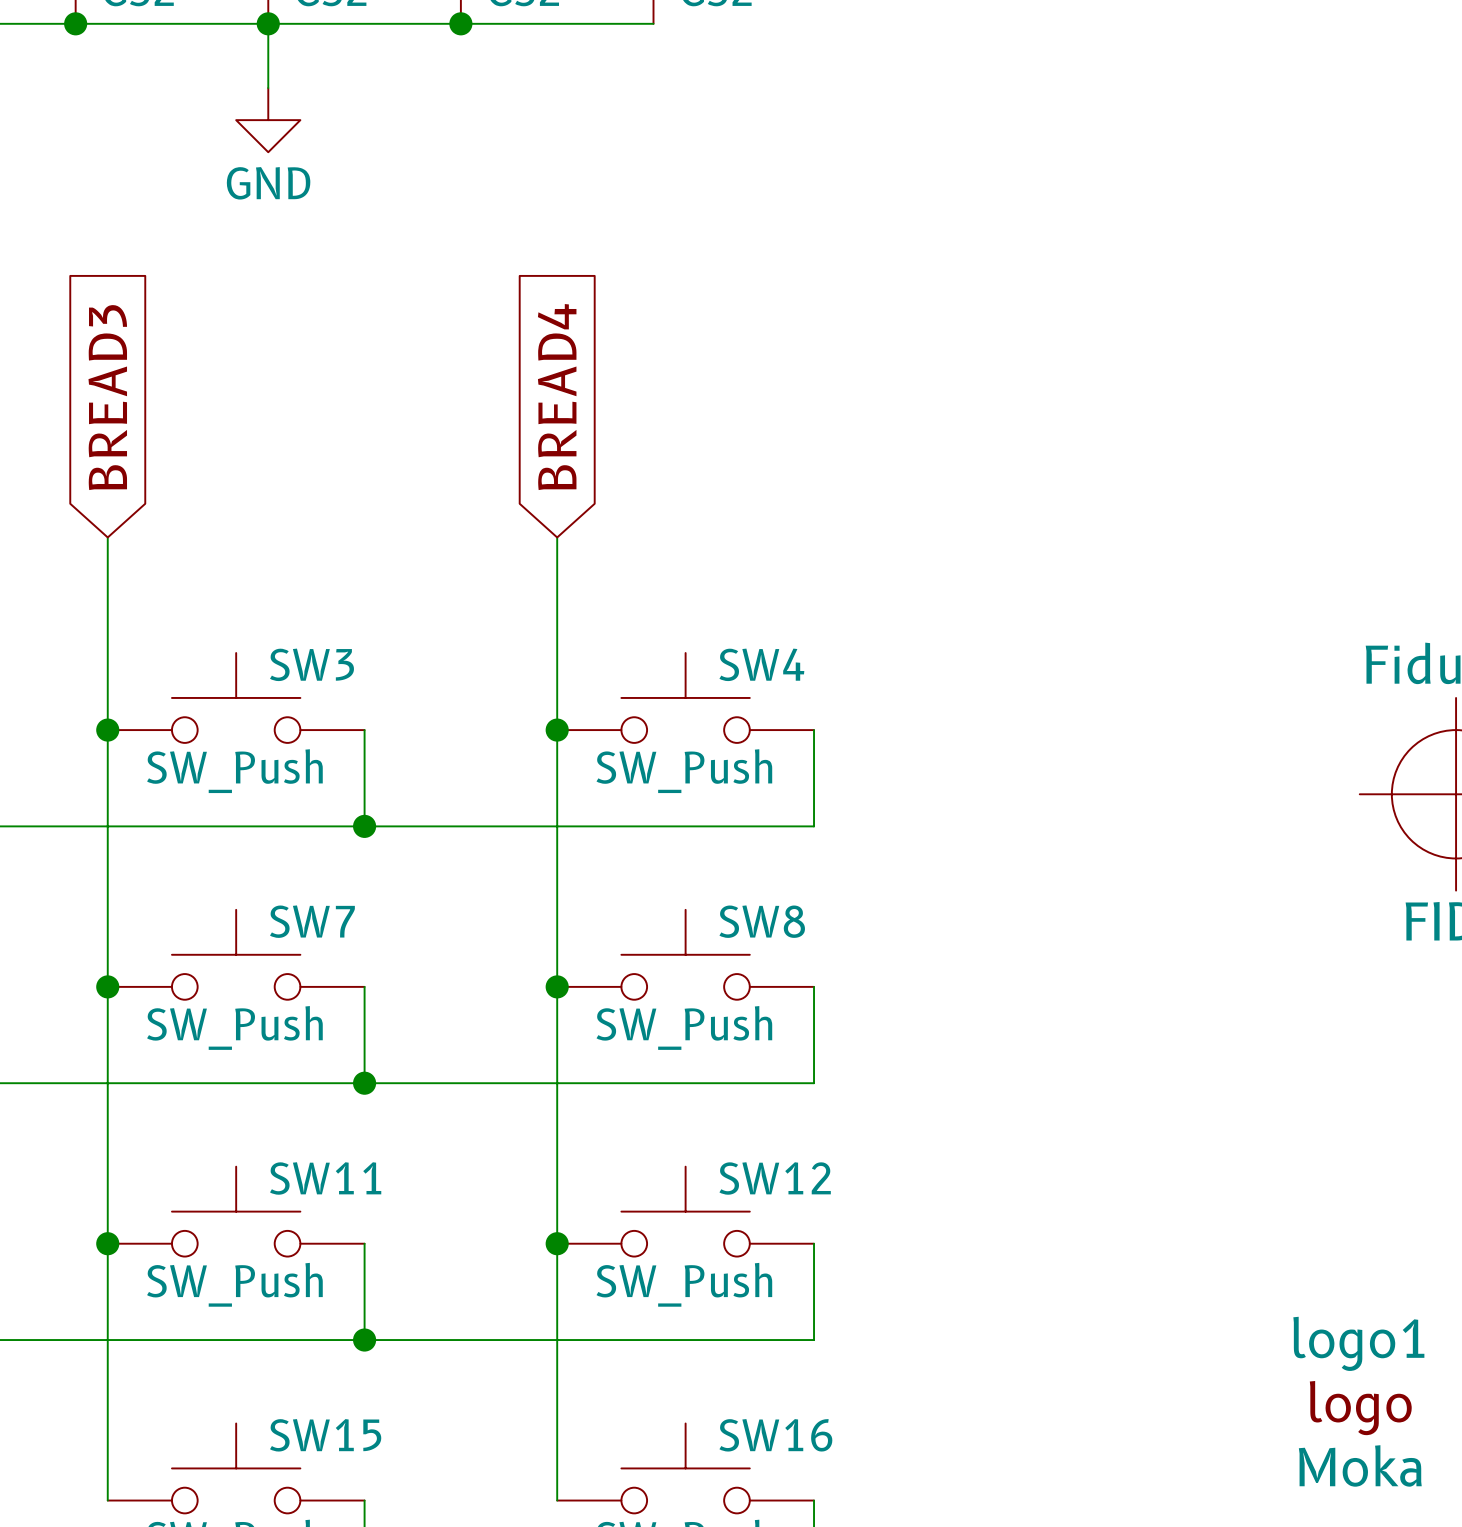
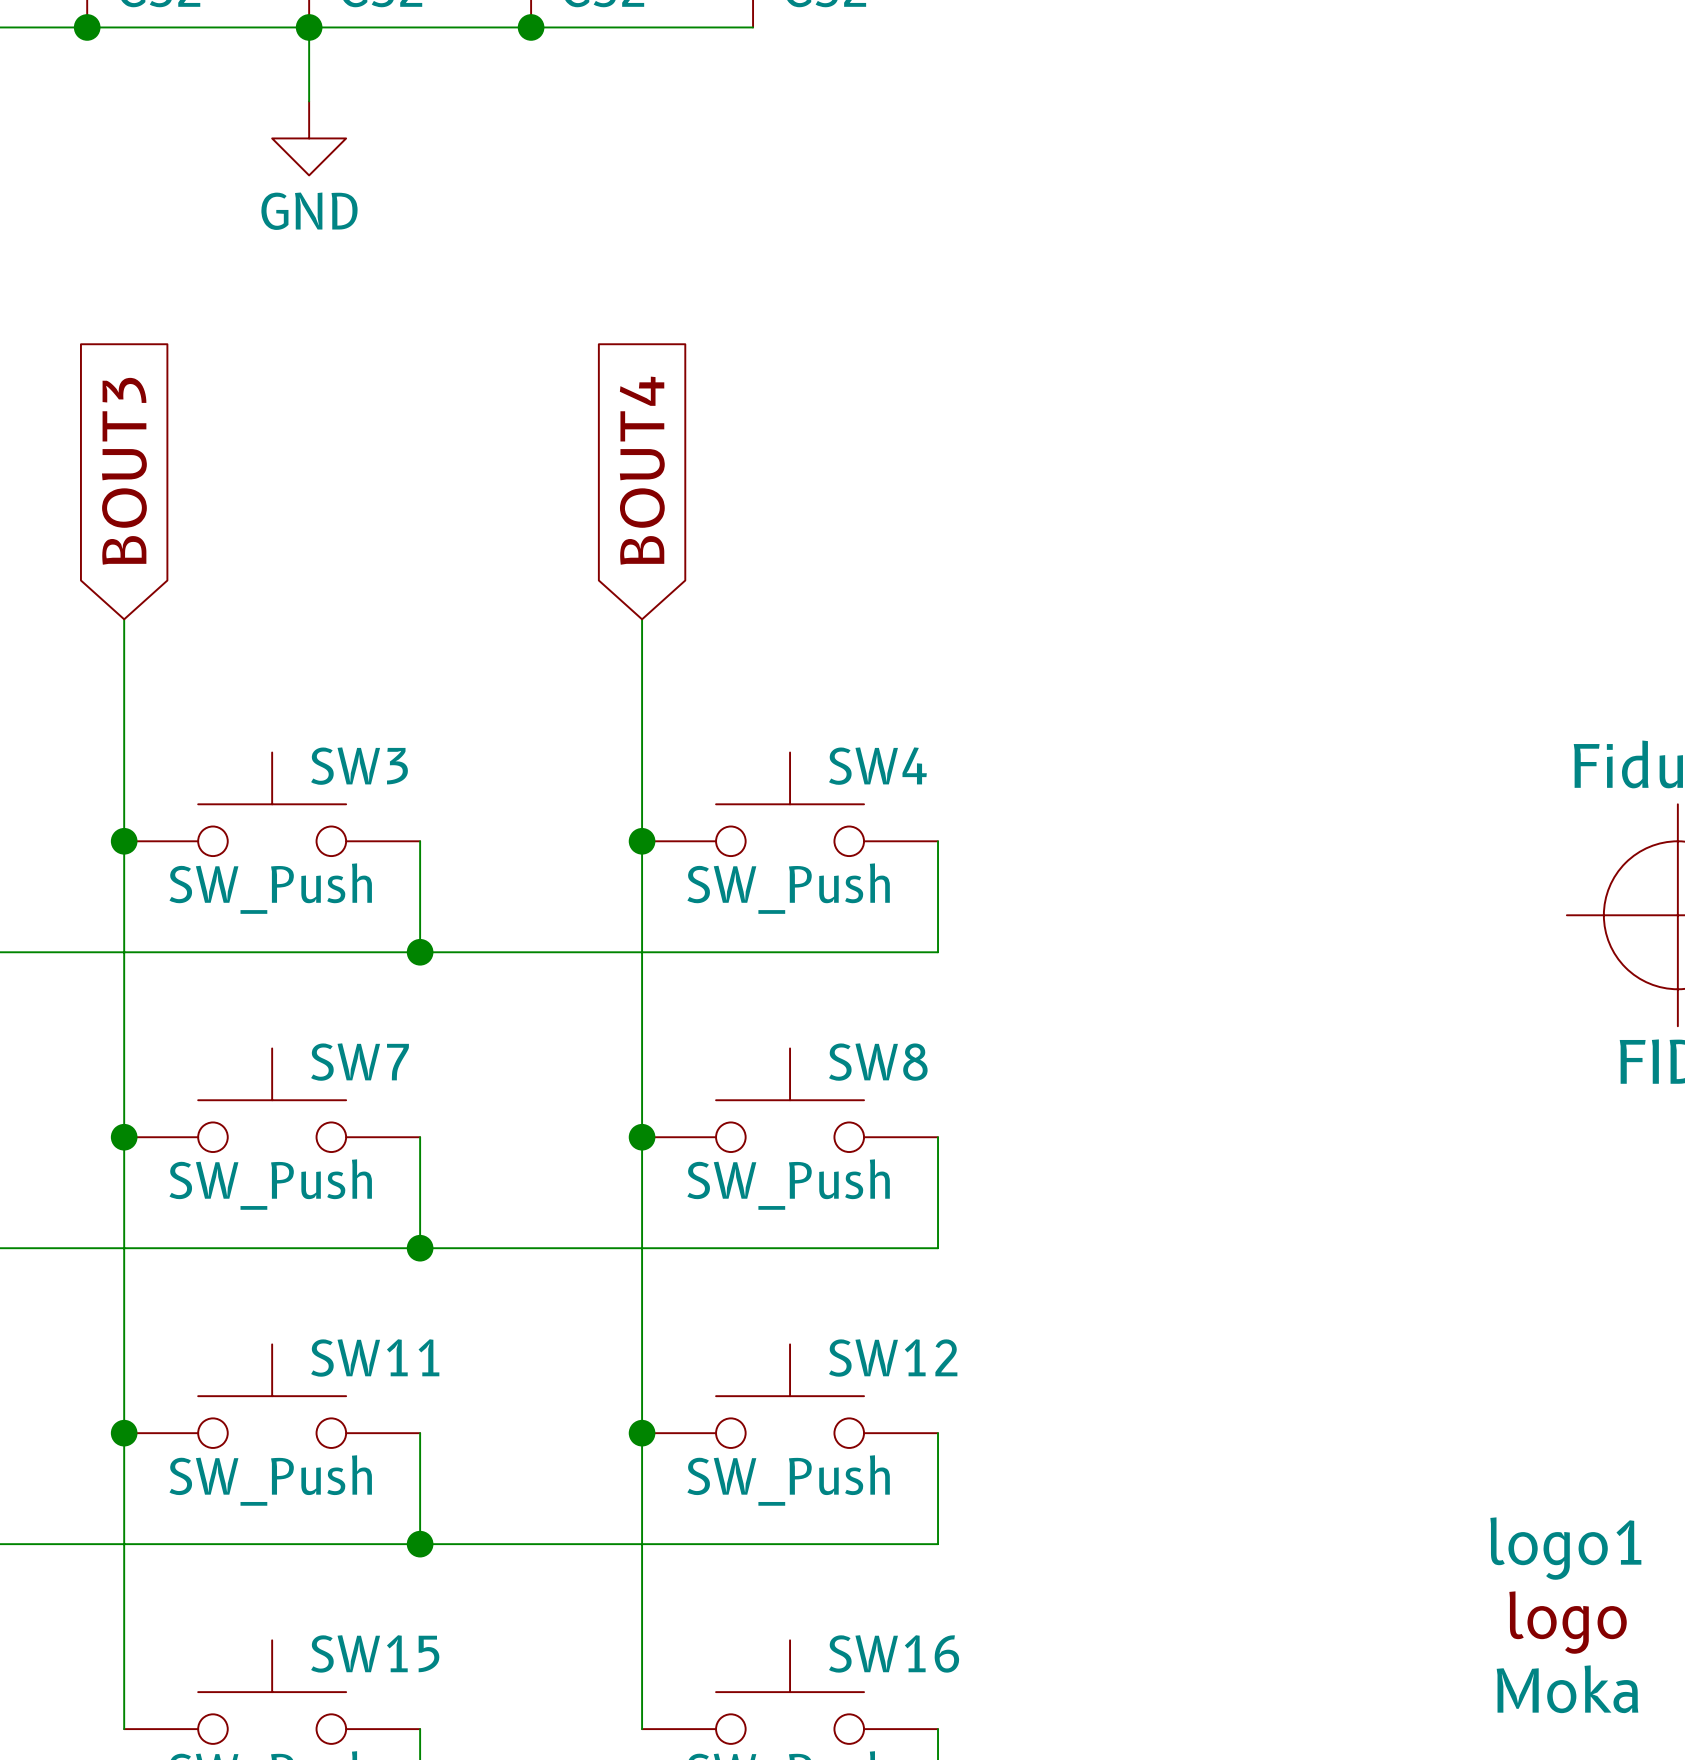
global label: BREAD3 (107, 397) -> BOUT3 (124, 471)
global label: BREAD4 (557, 397) -> BOUT4 (642, 470)

